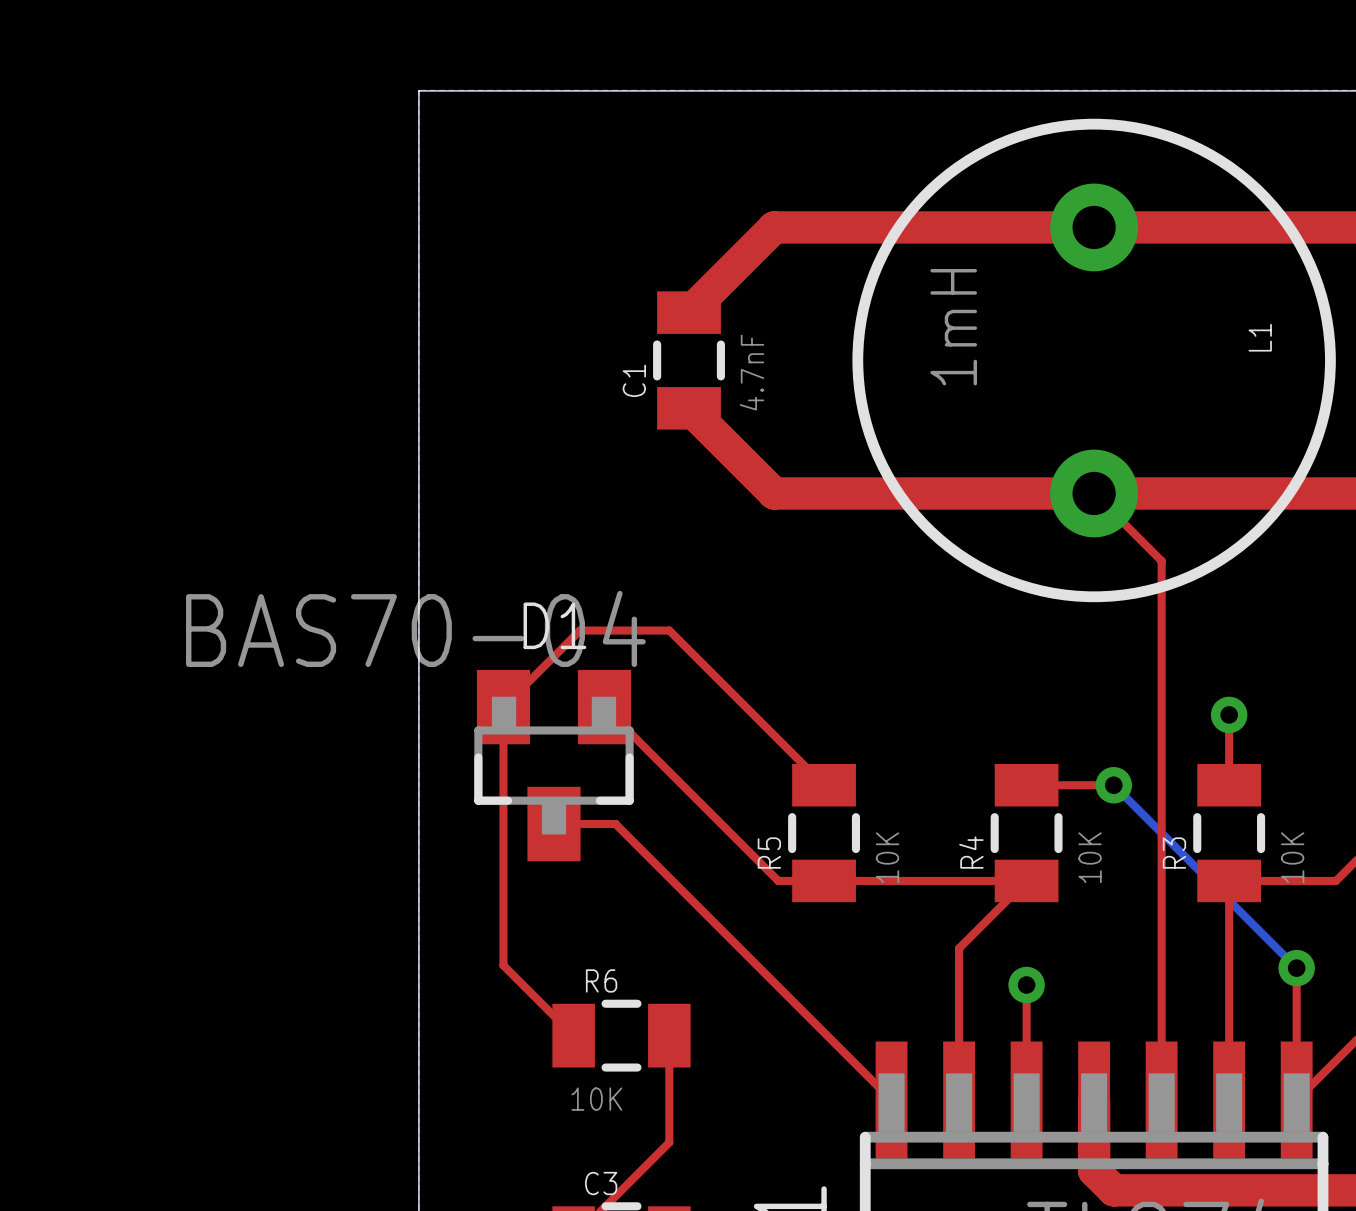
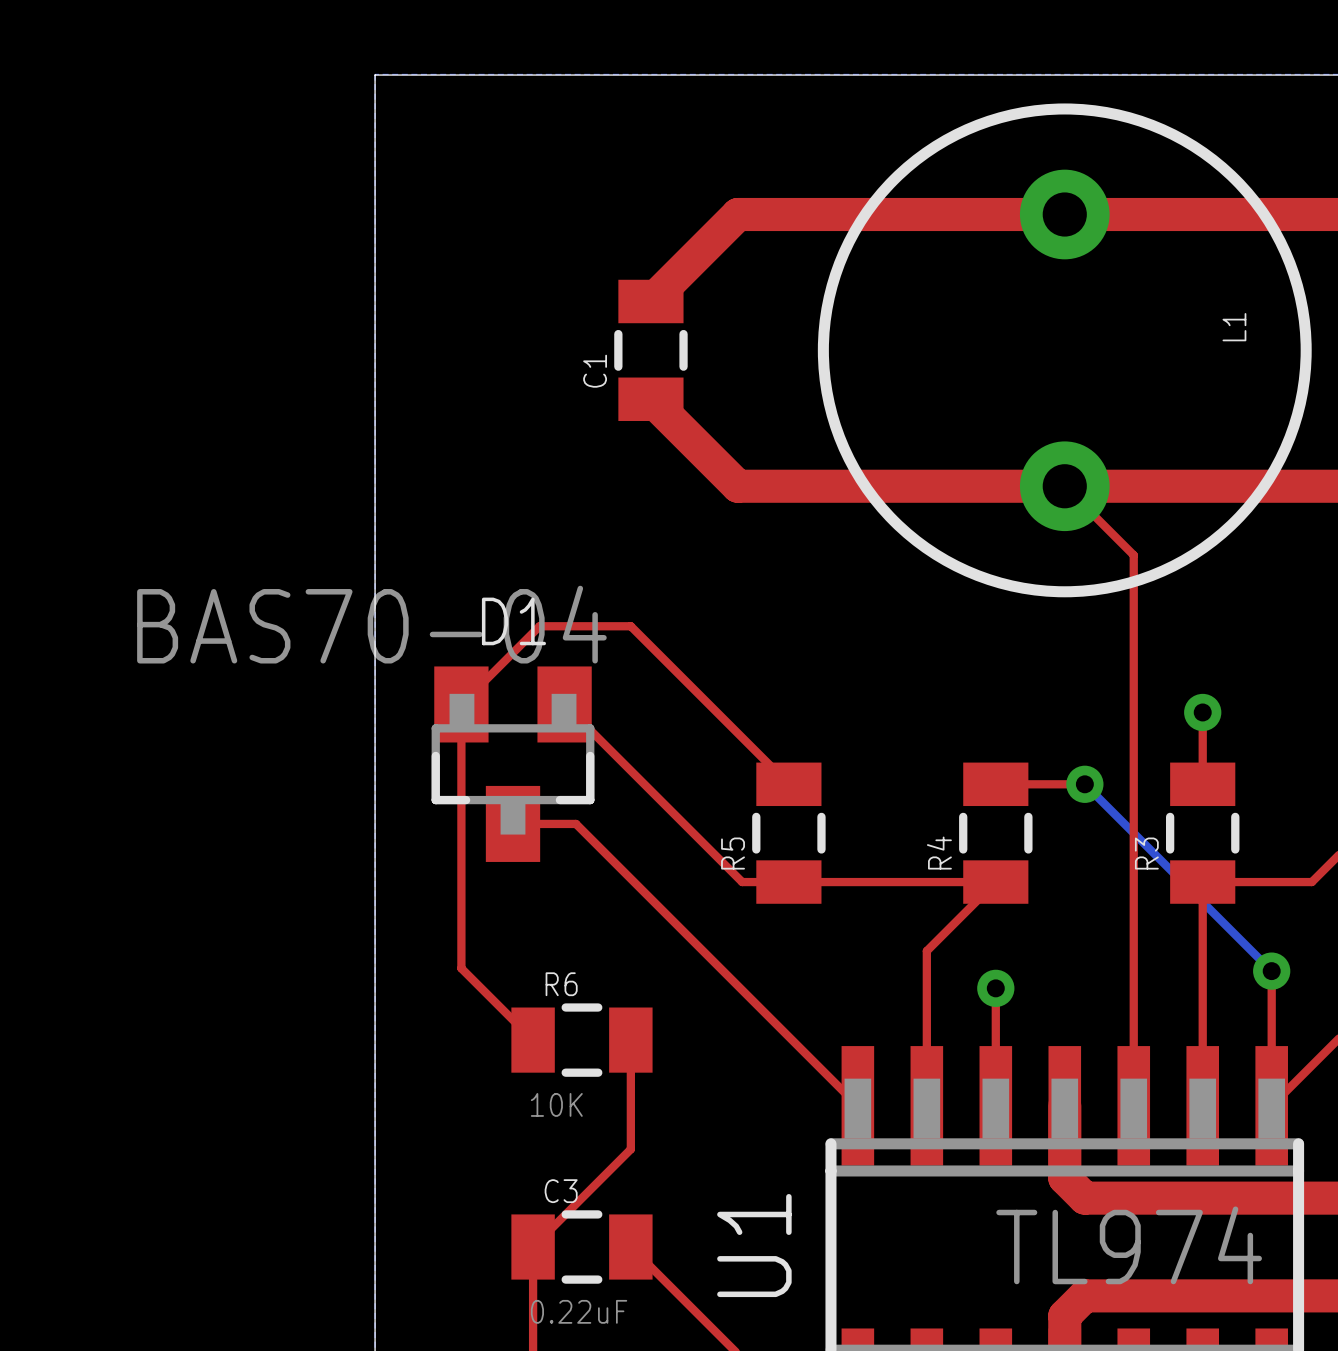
L1 value: 1mH (953, 327) -> none
C1 value: 4.7nF (751, 372) -> none
R5 value: 10K (887, 857) -> none
R4 value: 10K (1090, 857) -> none
R3 value: 10K (1292, 857) -> none

